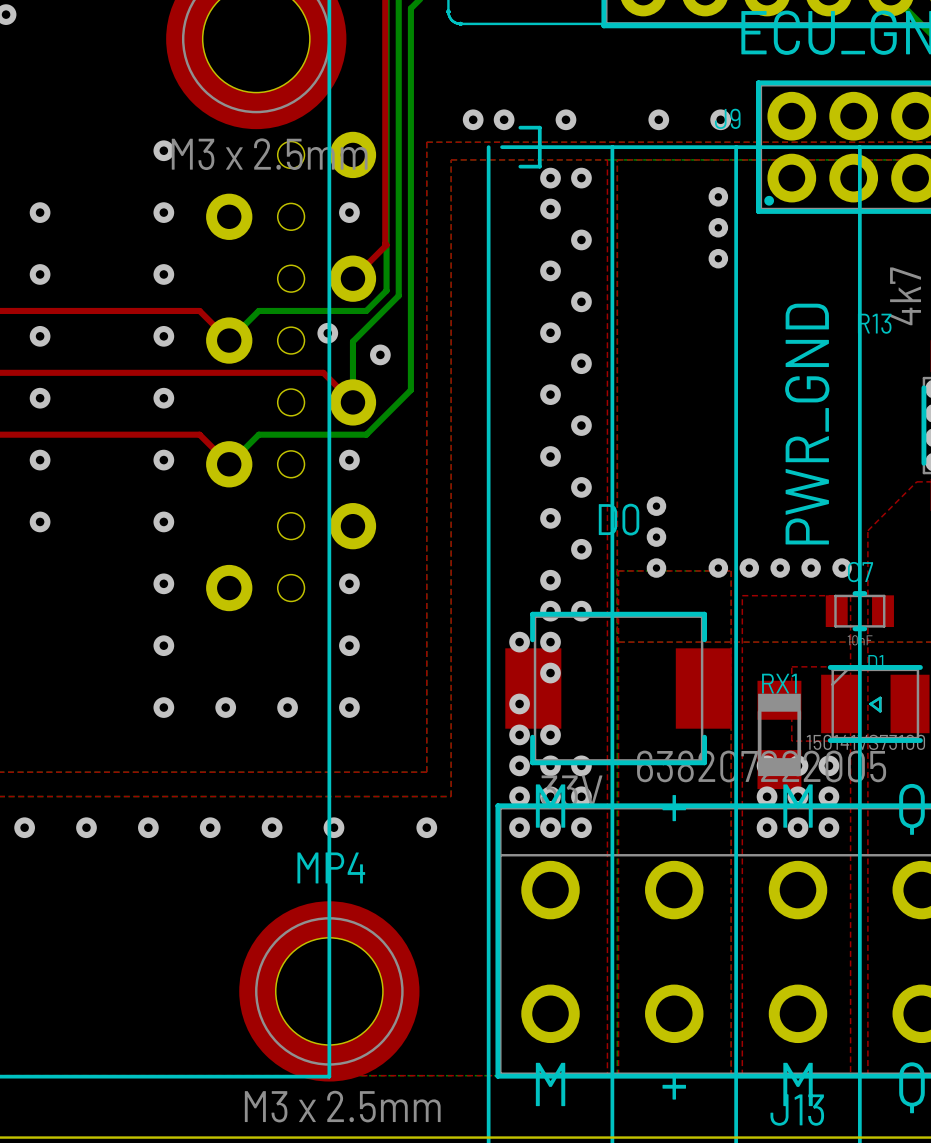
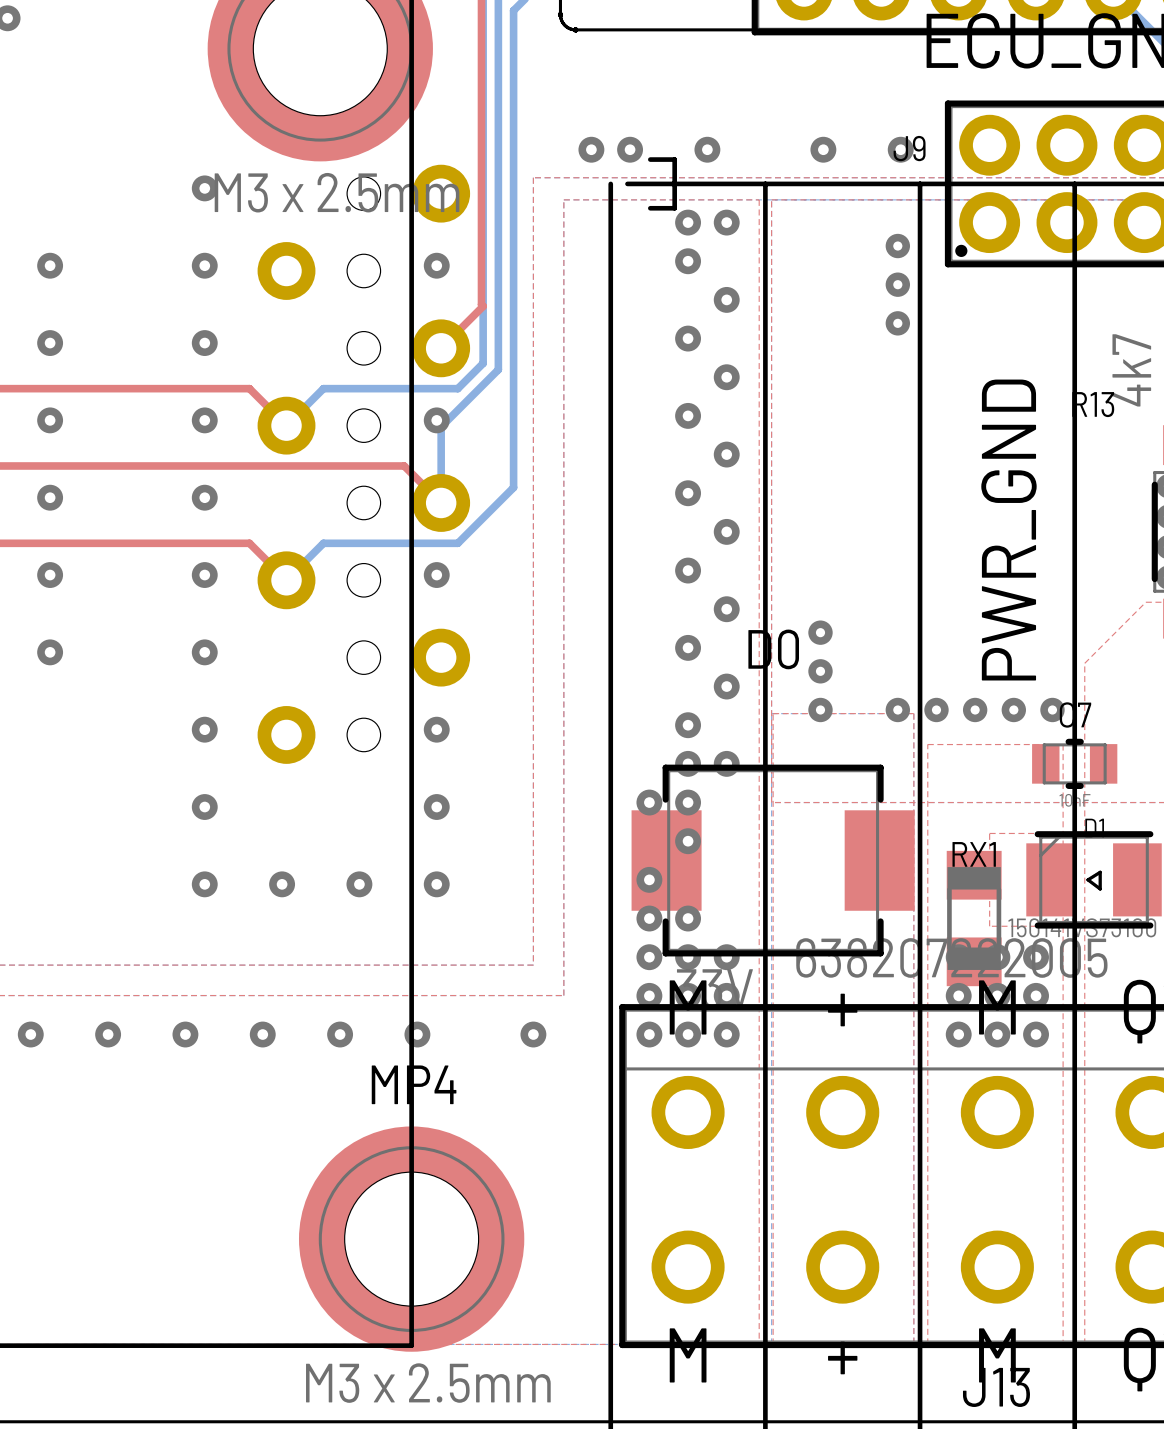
via: (327, 333) -> none
via: none -> (436, 420)
via: (380, 354) -> none

